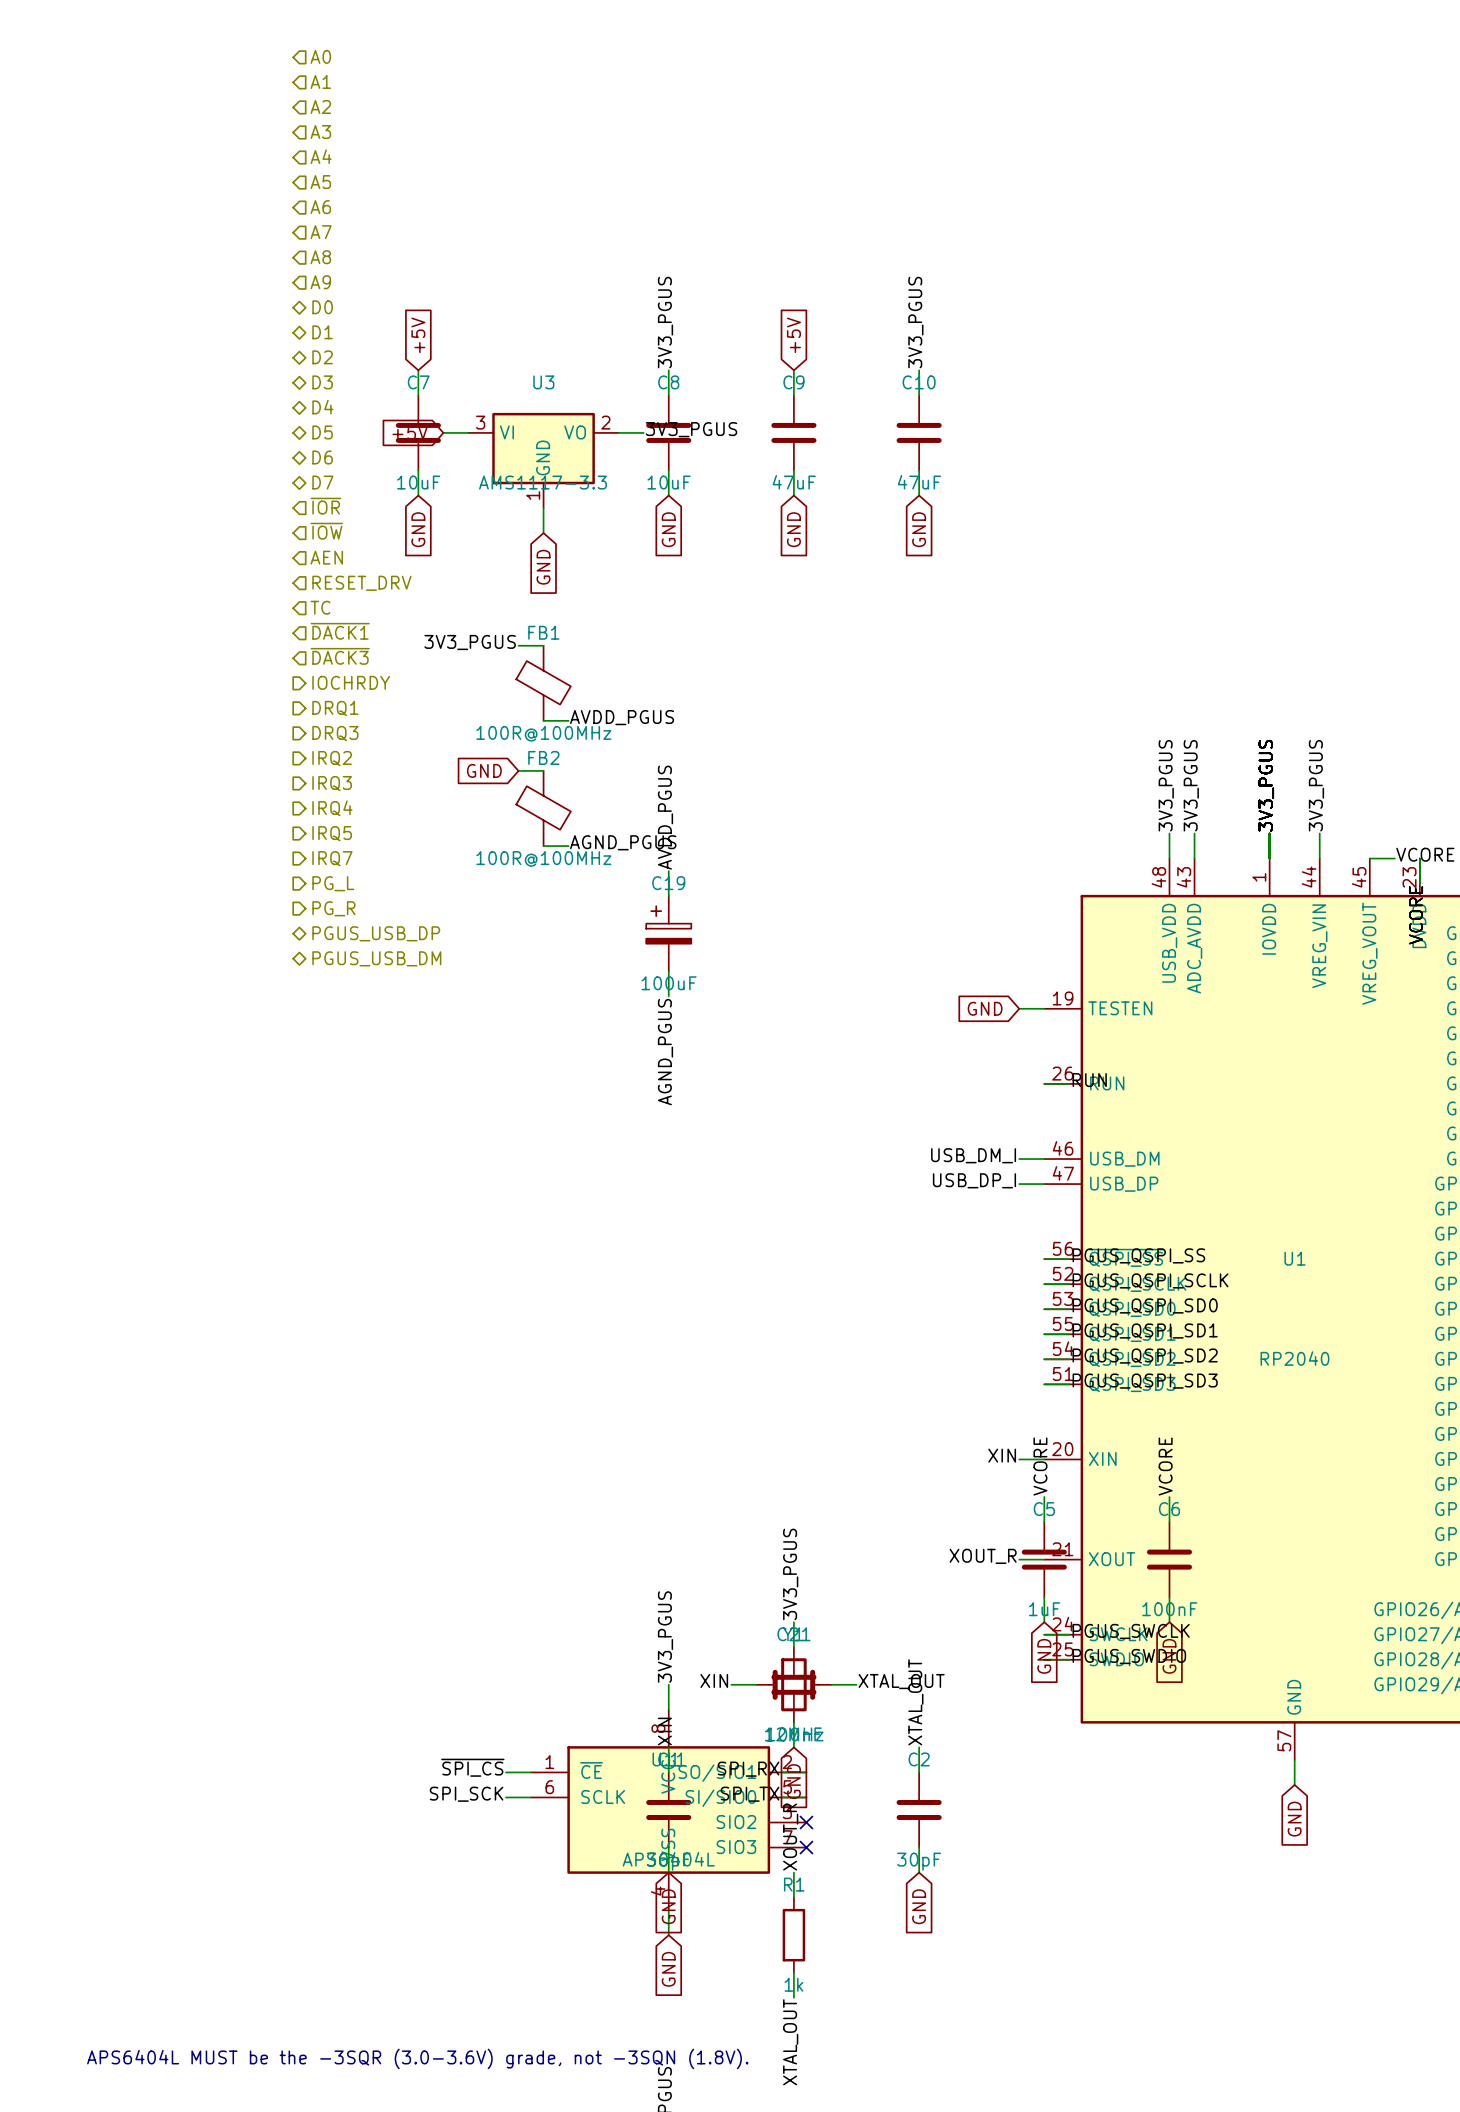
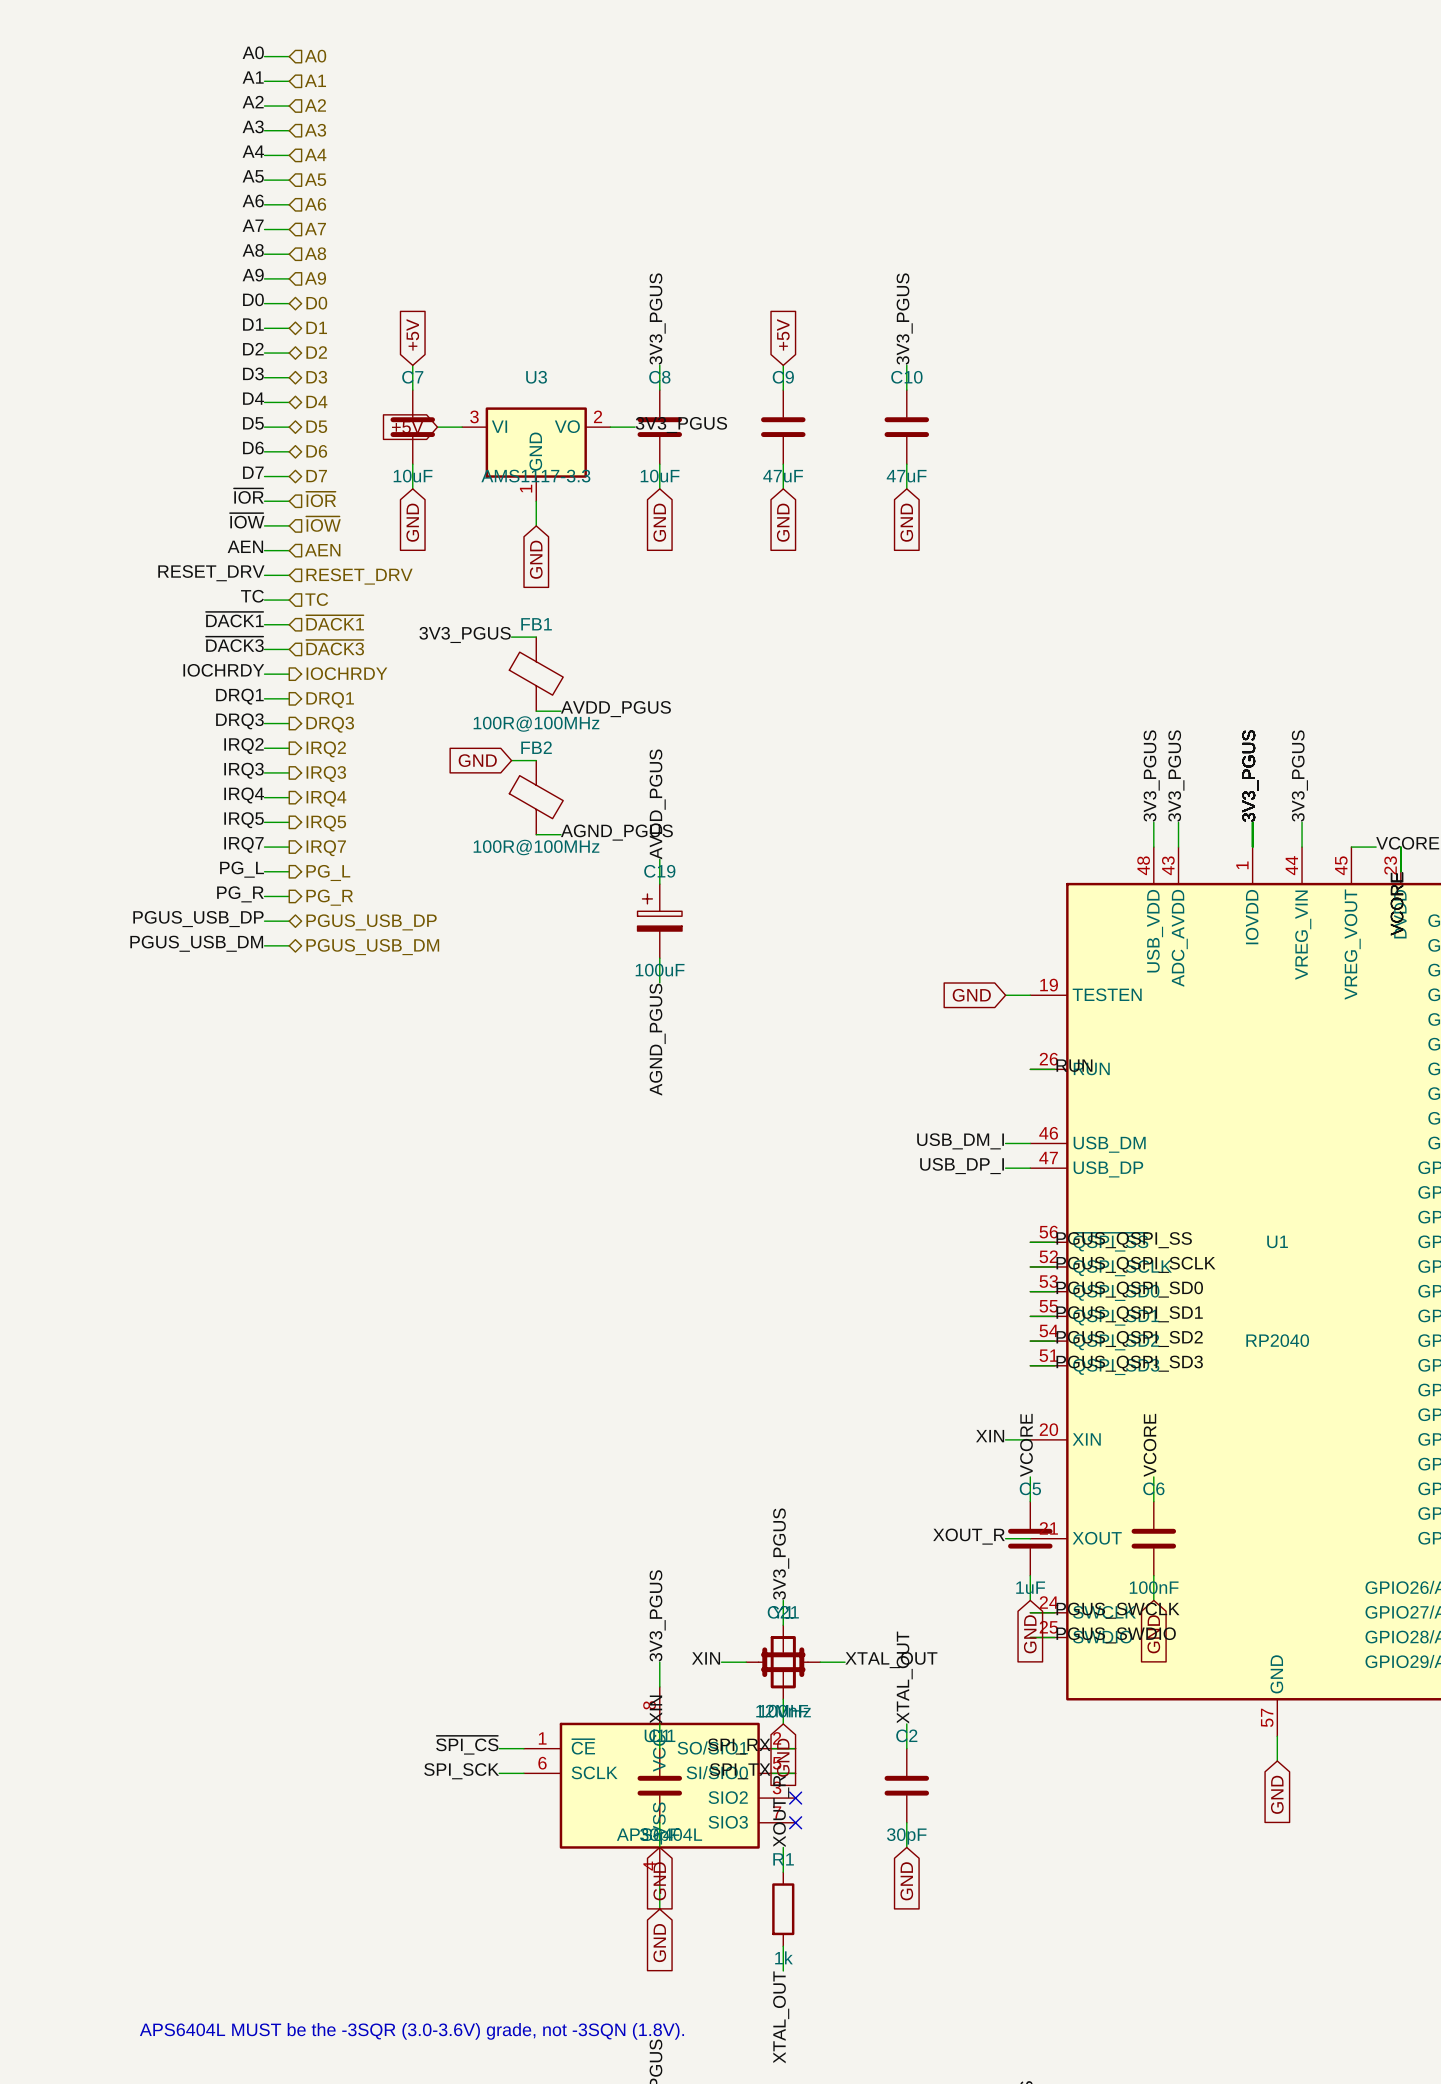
label: none -> A0 (253, 52)
wire: none -> (264, 56) (289, 56)
label: none -> A1 (253, 77)
wire: none -> (264, 81) (289, 81)
label: none -> A2 (253, 102)
wire: none -> (264, 106) (289, 106)
label: none -> A3 (253, 126)
wire: none -> (264, 130) (289, 130)
label: none -> A4 (253, 151)
wire: none -> (264, 155) (289, 155)
label: none -> A5 (253, 176)
wire: none -> (264, 180) (289, 180)
label: none -> A6 (253, 201)
wire: none -> (264, 204) (289, 204)
label: none -> A7 (253, 225)
wire: none -> (264, 229) (289, 229)
label: none -> A8 (253, 250)
wire: none -> (264, 254) (289, 254)
label: none -> A9 (253, 275)
wire: none -> (264, 278) (289, 278)
label: none -> D0 (253, 299)
wire: none -> (264, 303) (289, 303)
label: none -> D1 (253, 324)
wire: none -> (264, 328) (289, 328)
label: none -> D2 (253, 349)
wire: none -> (264, 353) (289, 353)
label: none -> D3 (253, 373)
wire: none -> (264, 377) (289, 377)
label: none -> D4 (253, 398)
wire: none -> (264, 402) (289, 402)
label: none -> D5 (253, 423)
wire: none -> (264, 427) (289, 427)
label: none -> D6 (253, 448)
wire: none -> (264, 451) (289, 451)
label: none -> D7 (253, 472)
wire: none -> (264, 476) (289, 476)
label: none -> ~{IOR} (248, 496)
wire: none -> (264, 501) (289, 501)
label: none -> ~{IOW} (247, 520)
wire: none -> (264, 525) (289, 525)
label: none -> AEN (245, 546)
wire: none -> (264, 550) (289, 550)
label: none -> RESET_DRV (211, 573)
wire: none -> (264, 575) (289, 575)
label: none -> TC (252, 596)
wire: none -> (264, 600) (289, 600)
label: none -> ~{DACK1} (234, 619)
wire: none -> (264, 624) (289, 624)
label: none -> ~{DACK3} (234, 644)
wire: none -> (264, 649) (289, 649)
label: none -> IOCHRDY (223, 670)
wire: none -> (264, 674) (289, 674)
label: none -> DRQ1 (239, 696)
wire: none -> (264, 698) (289, 698)
label: none -> DRQ3 (239, 721)
wire: none -> (264, 723) (289, 723)
label: none -> IRQ2 (243, 746)
wire: none -> (264, 748) (289, 748)
label: none -> IRQ3 (244, 770)
wire: none -> (264, 772) (289, 772)
label: none -> IRQ4 (244, 795)
wire: none -> (264, 797) (289, 797)
label: none -> IRQ5 (244, 820)
wire: none -> (264, 822) (289, 822)
label: none -> IRQ7 (243, 844)
wire: none -> (264, 847) (289, 847)
label: none -> PG_L (242, 869)
wire: none -> (264, 871) (289, 871)
label: none -> PG_R (240, 894)
wire: none -> (264, 896) (289, 896)
label: none -> PGUS_USB_DP (198, 919)
wire: none -> (264, 921) (289, 921)
label: none -> PGUS_USB_DM (196, 943)
wire: none -> (264, 945) (289, 945)

